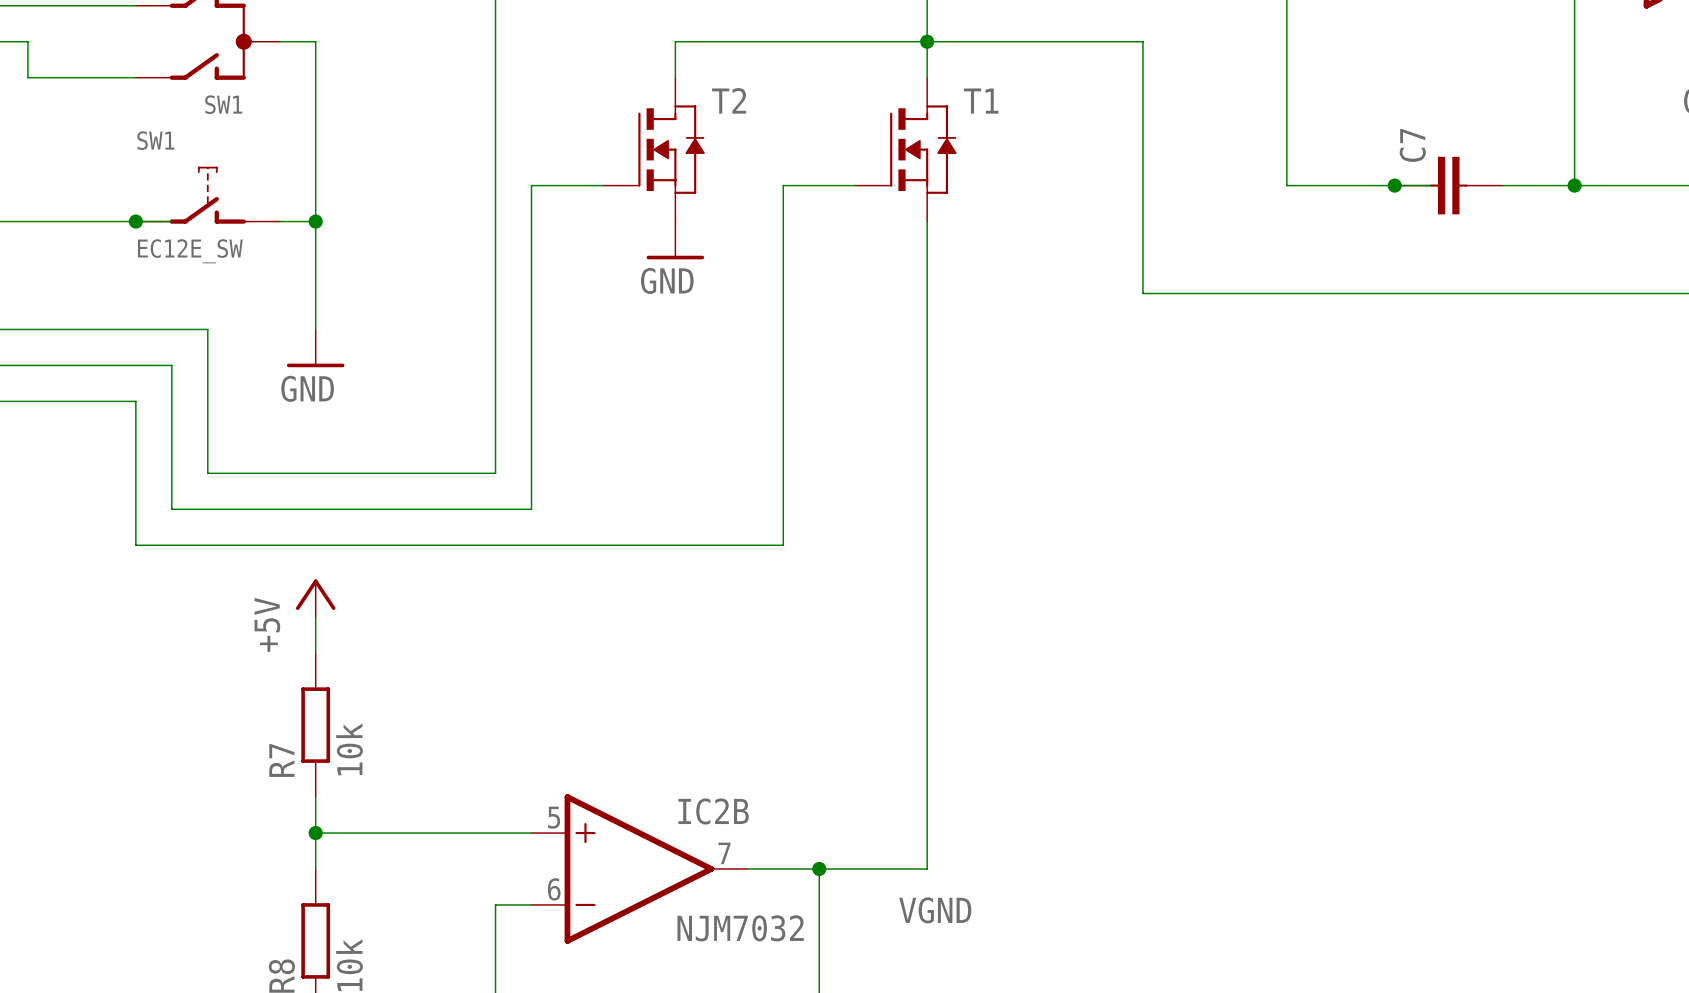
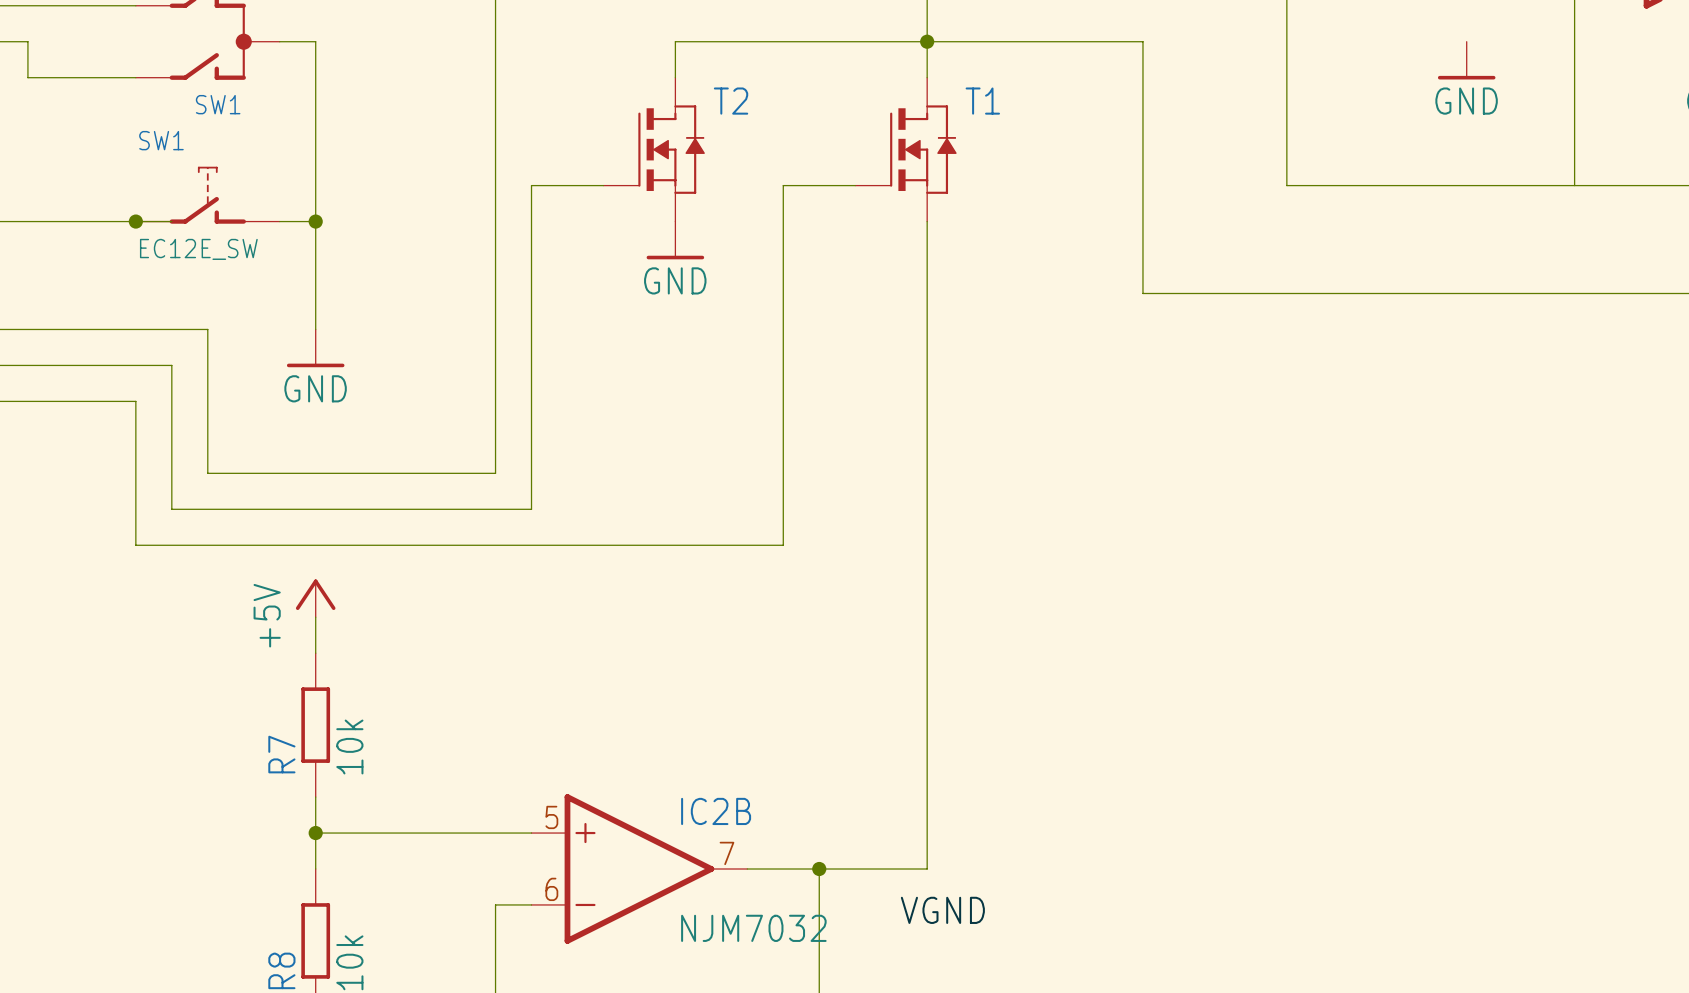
power symbol: none -> GND (1466, 60)
junction: (1394, 185) -> none
C7: (1448, 185) -> none
junction: (1574, 185) -> none

